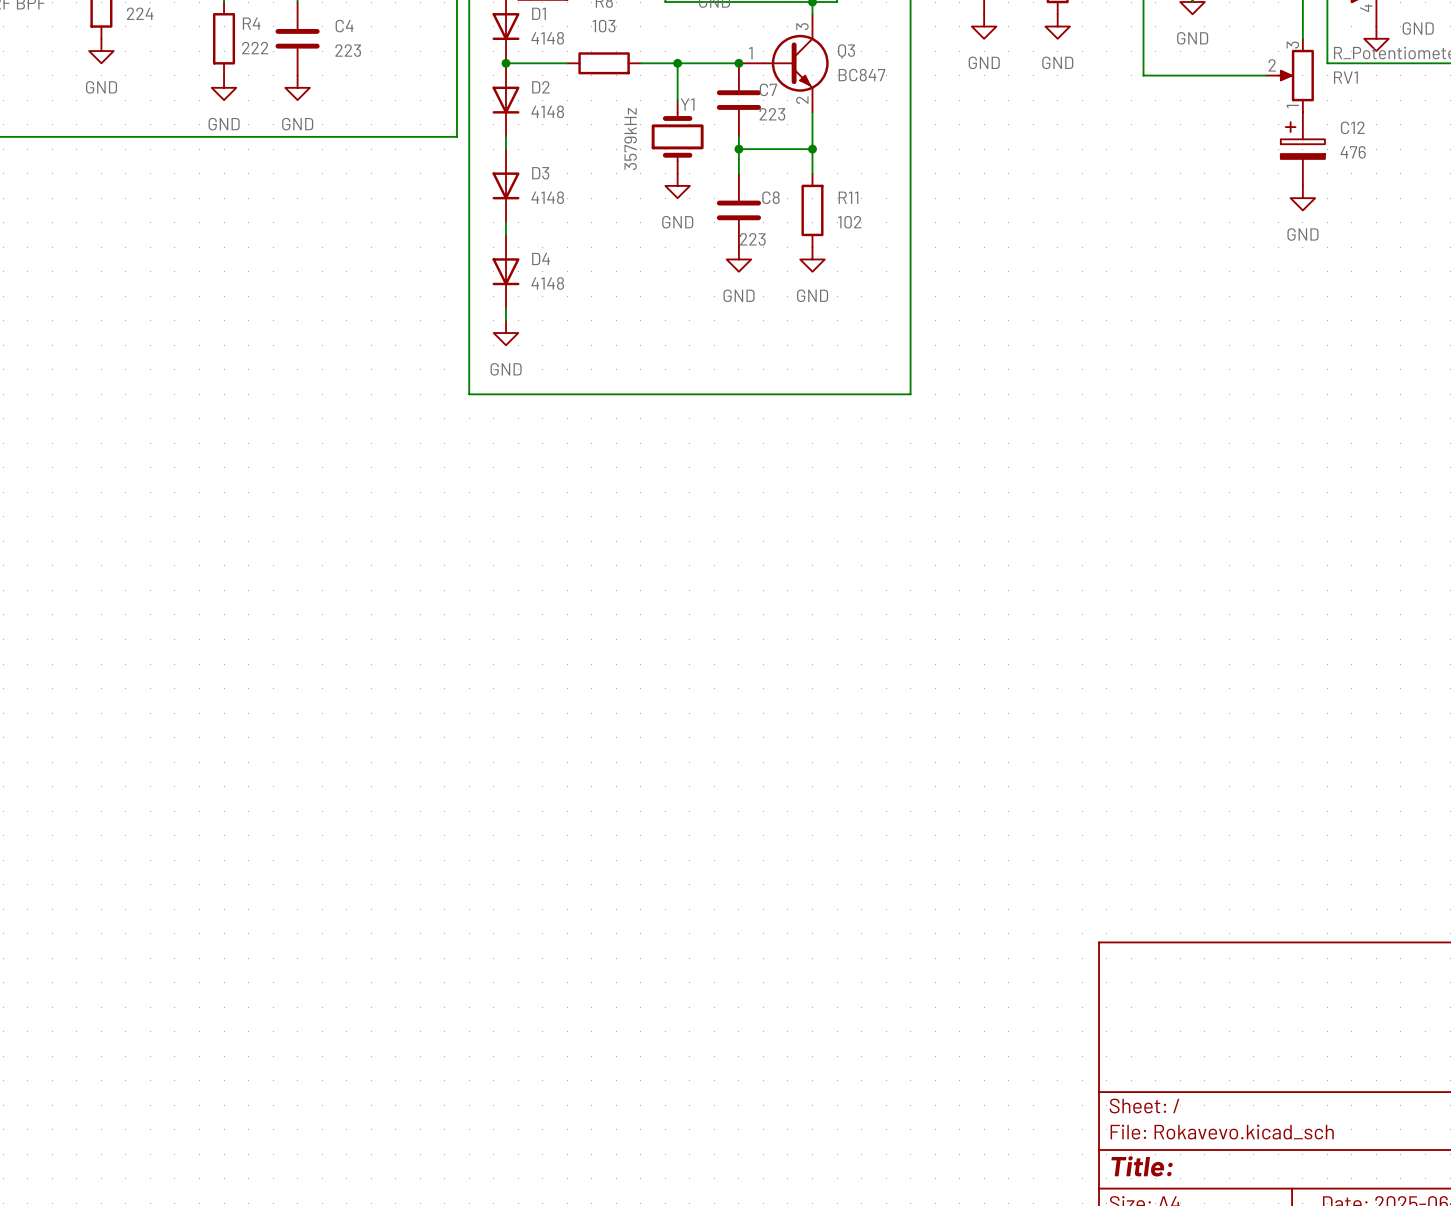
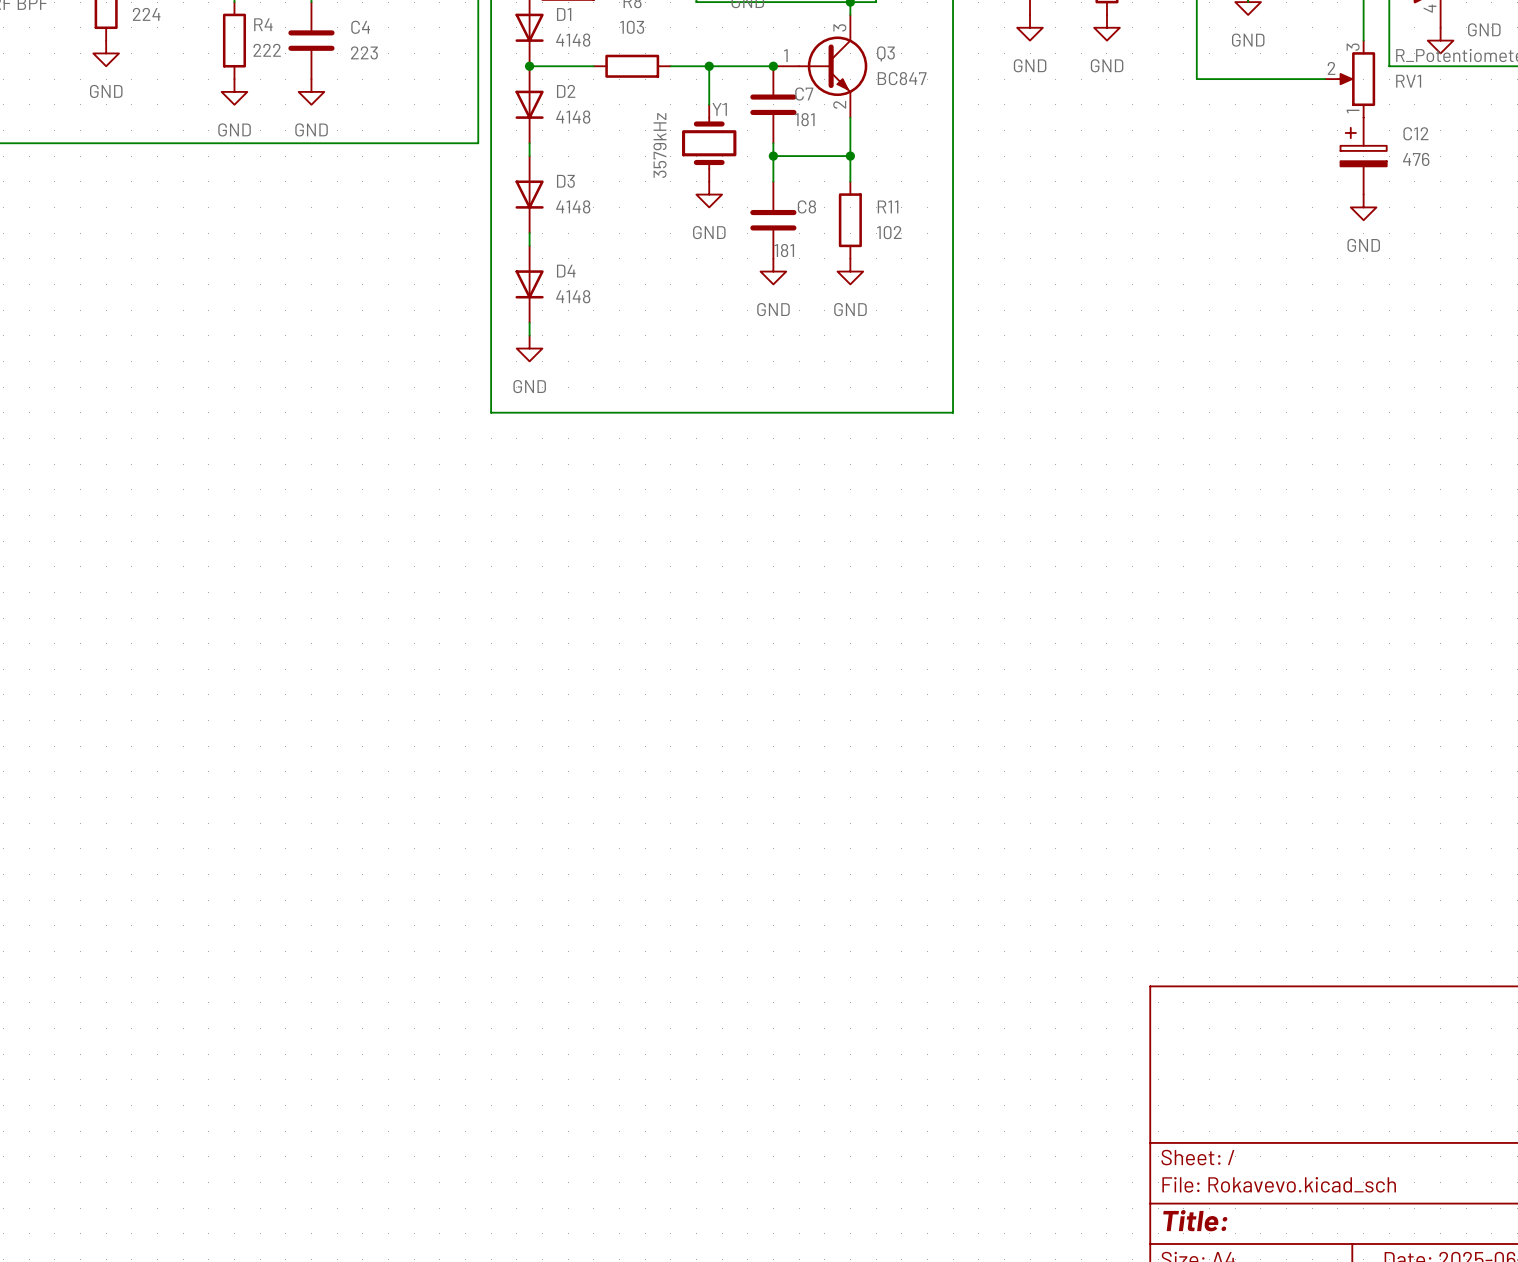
C7 value: 223 (772, 114) -> 181 (804, 119)
C8 value: 223 (752, 239) -> 181 (784, 250)

